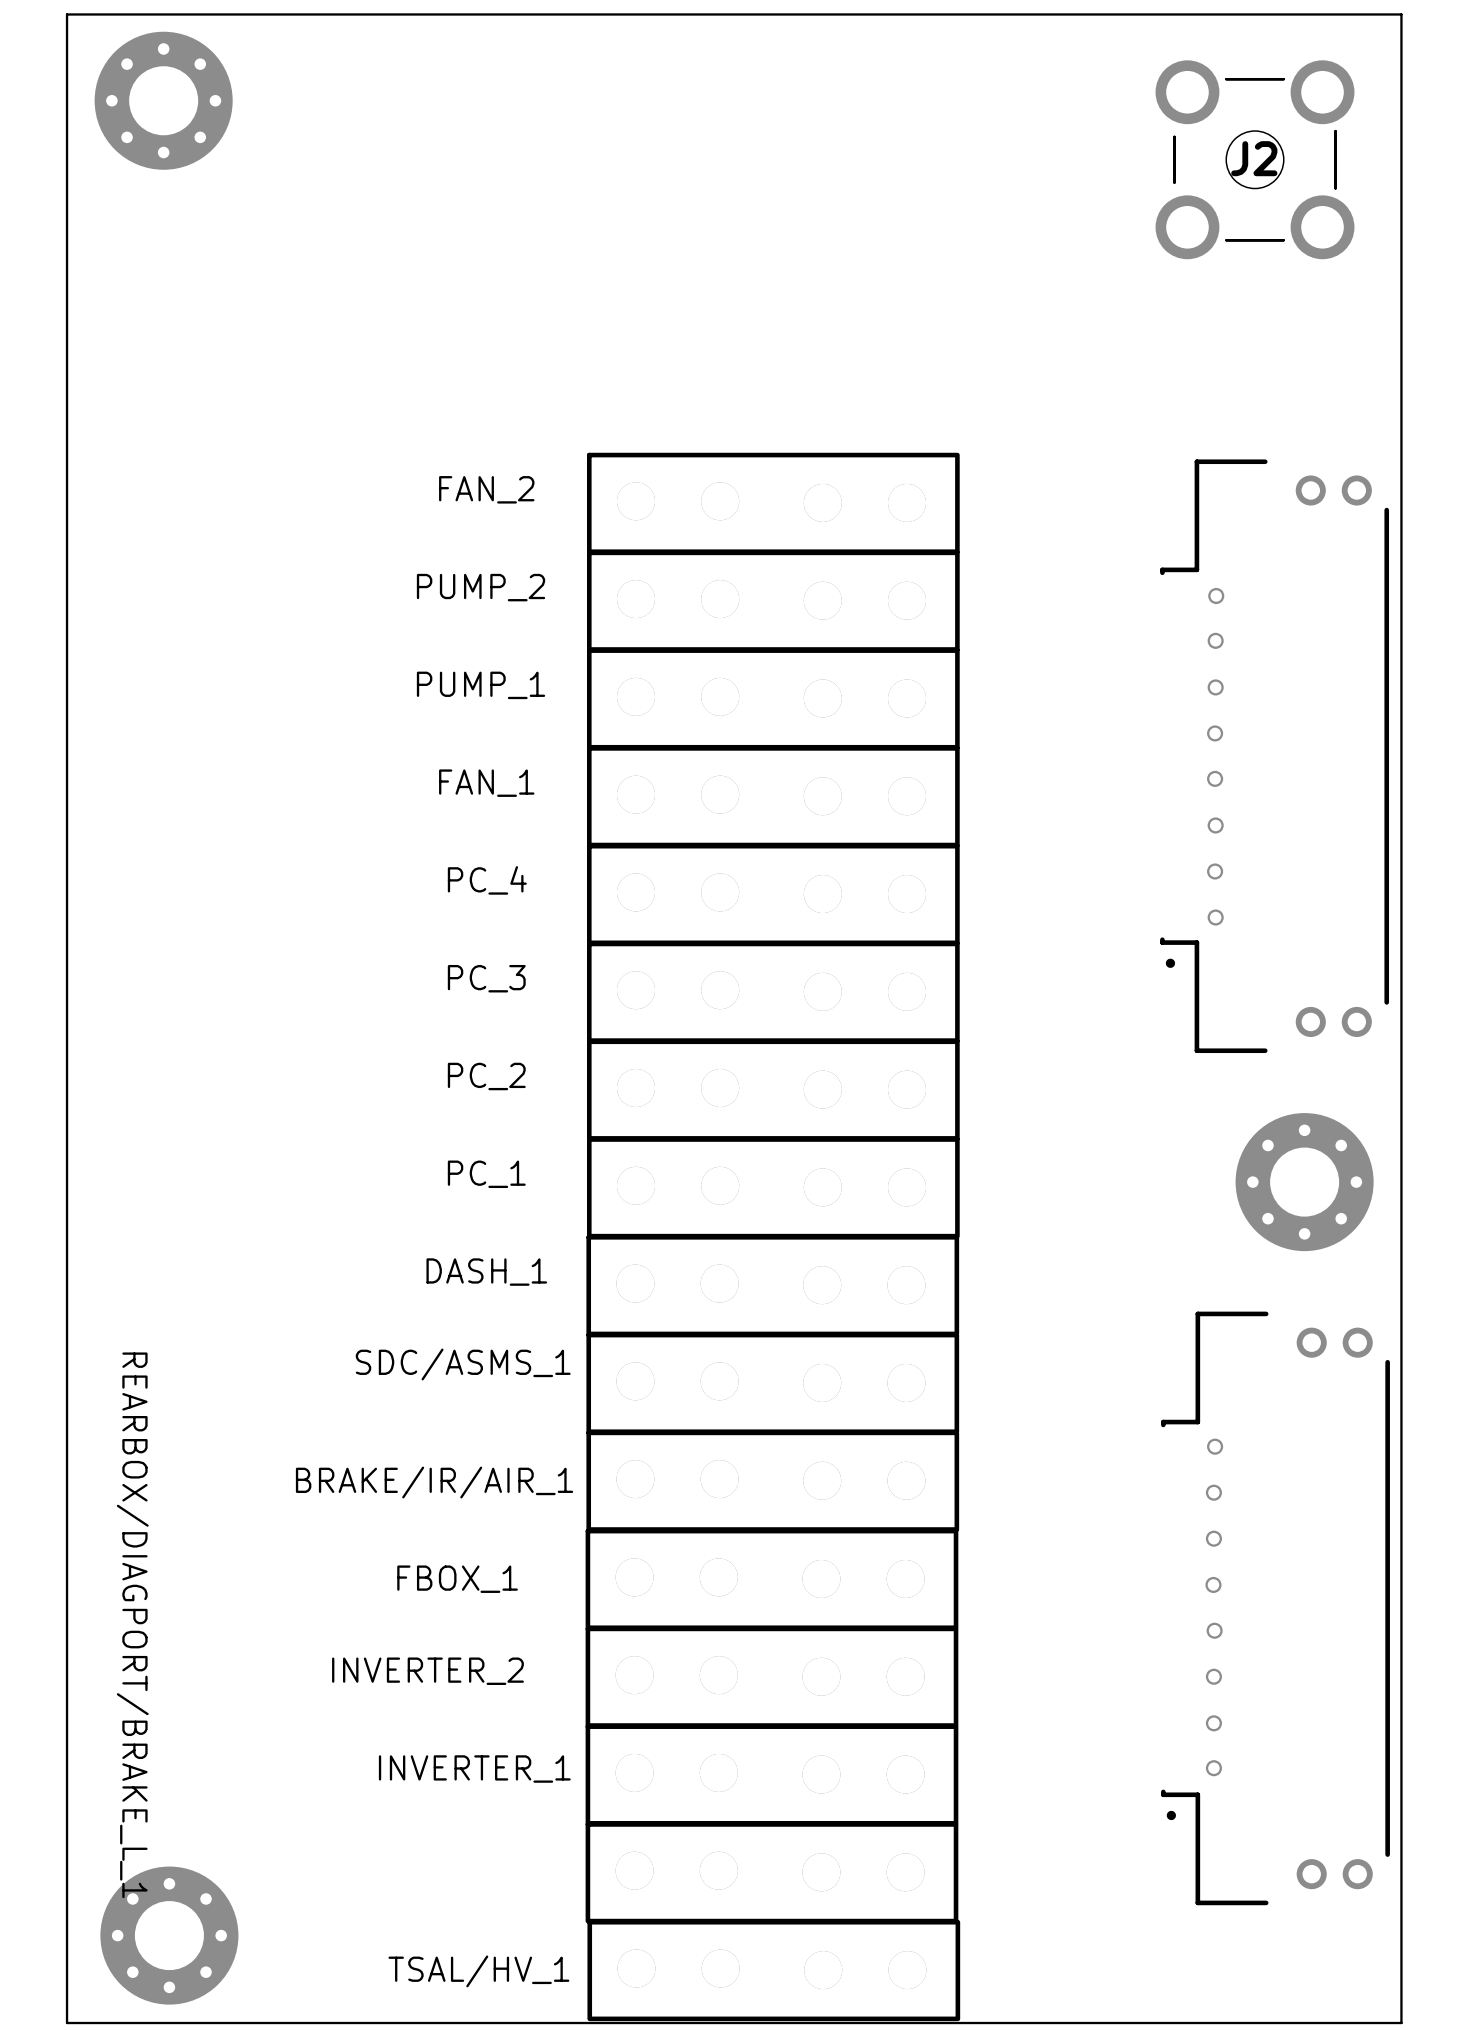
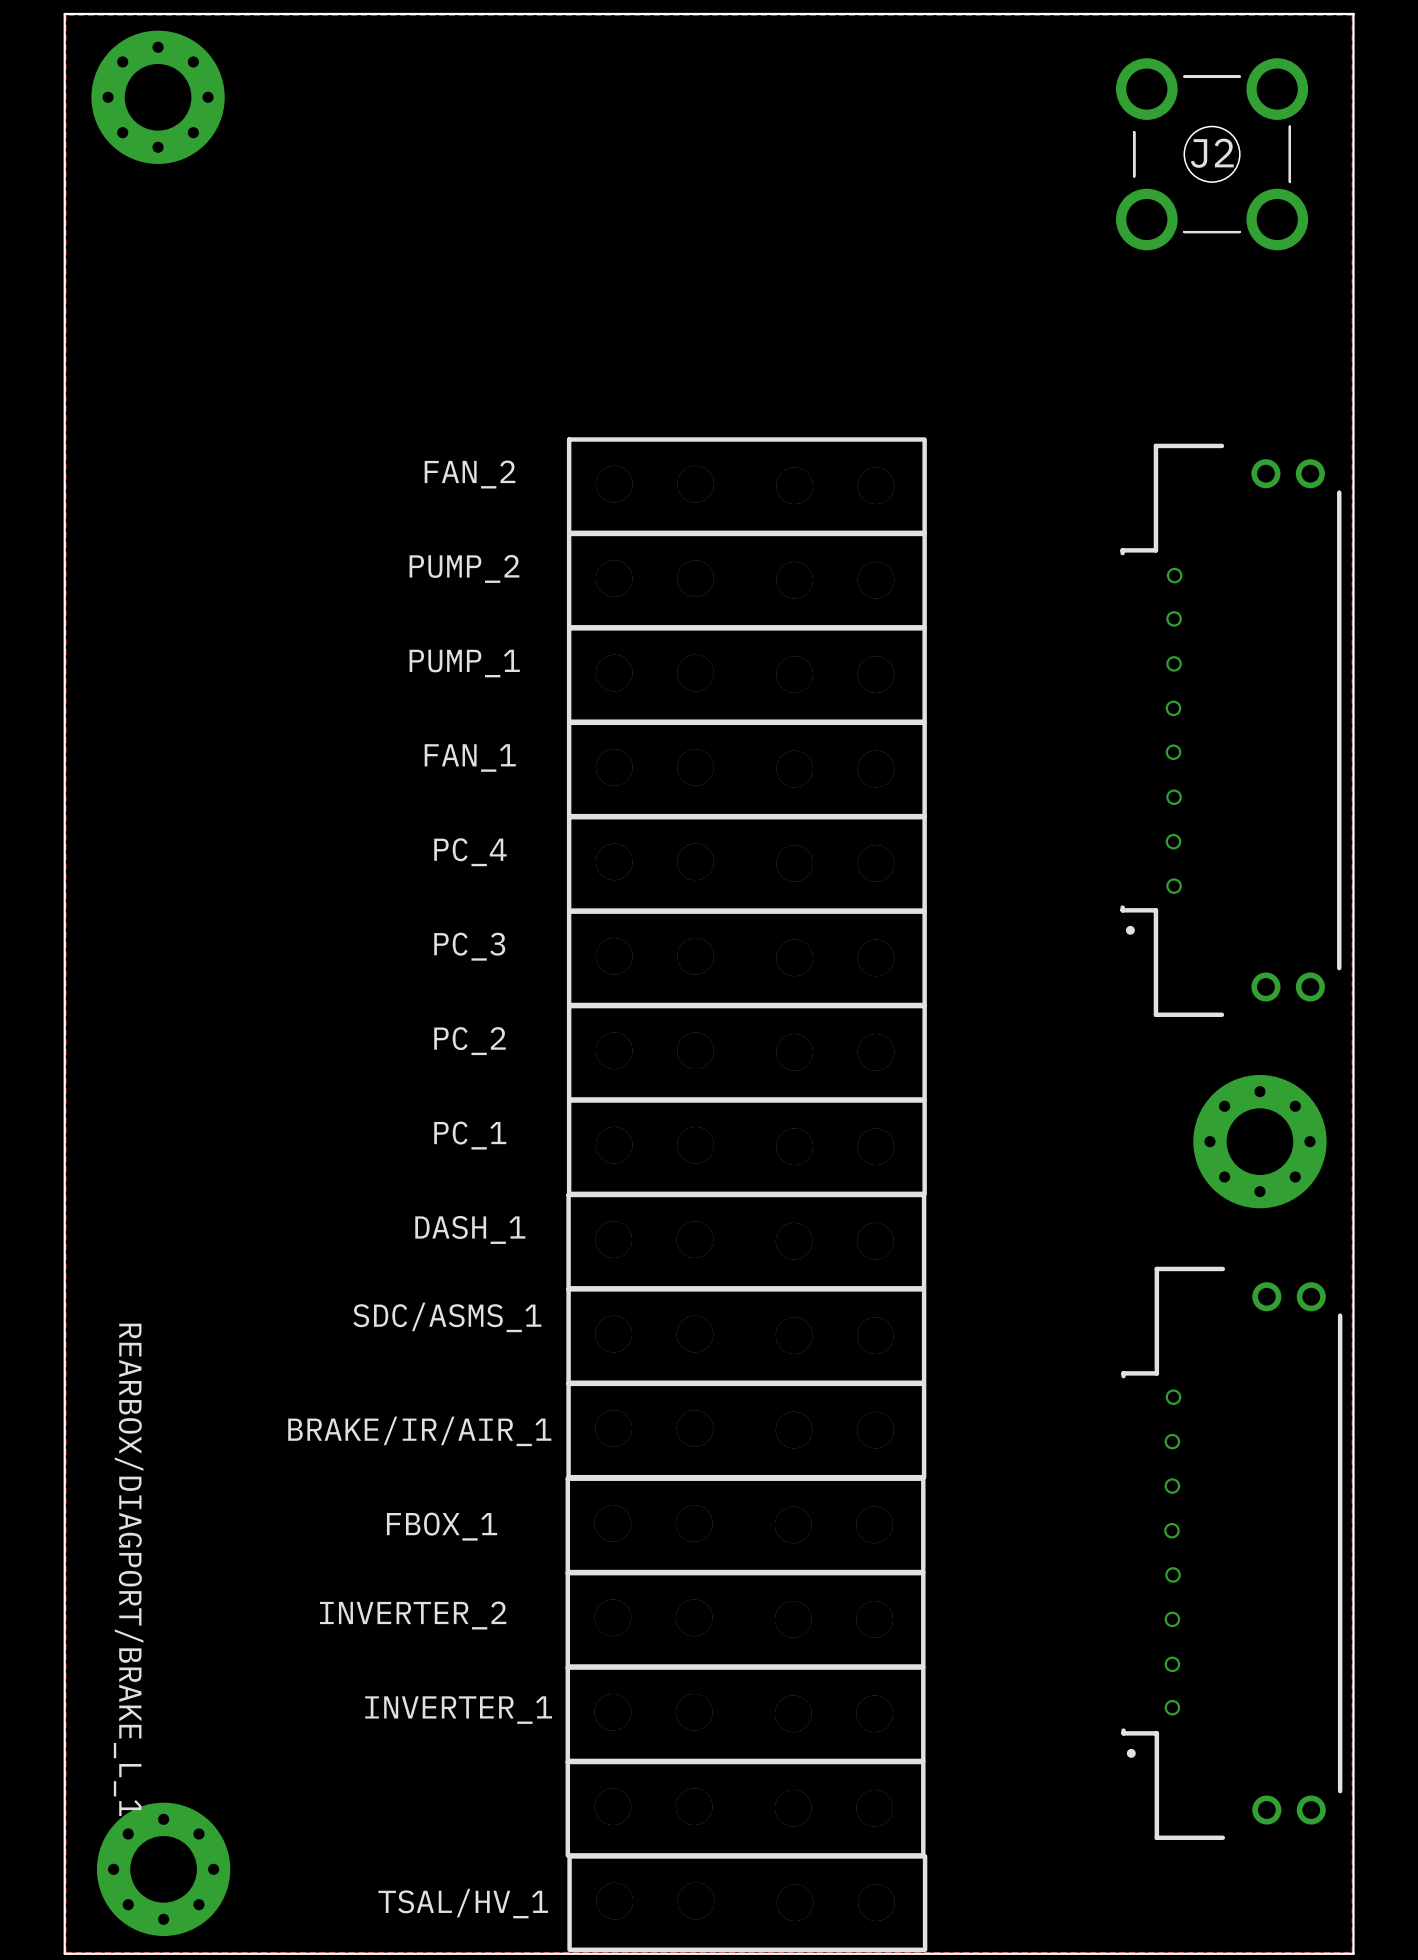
zone outline: none -> (65, 15) (65, 1952) (1352, 1952) (1352, 15) (65, 15)

